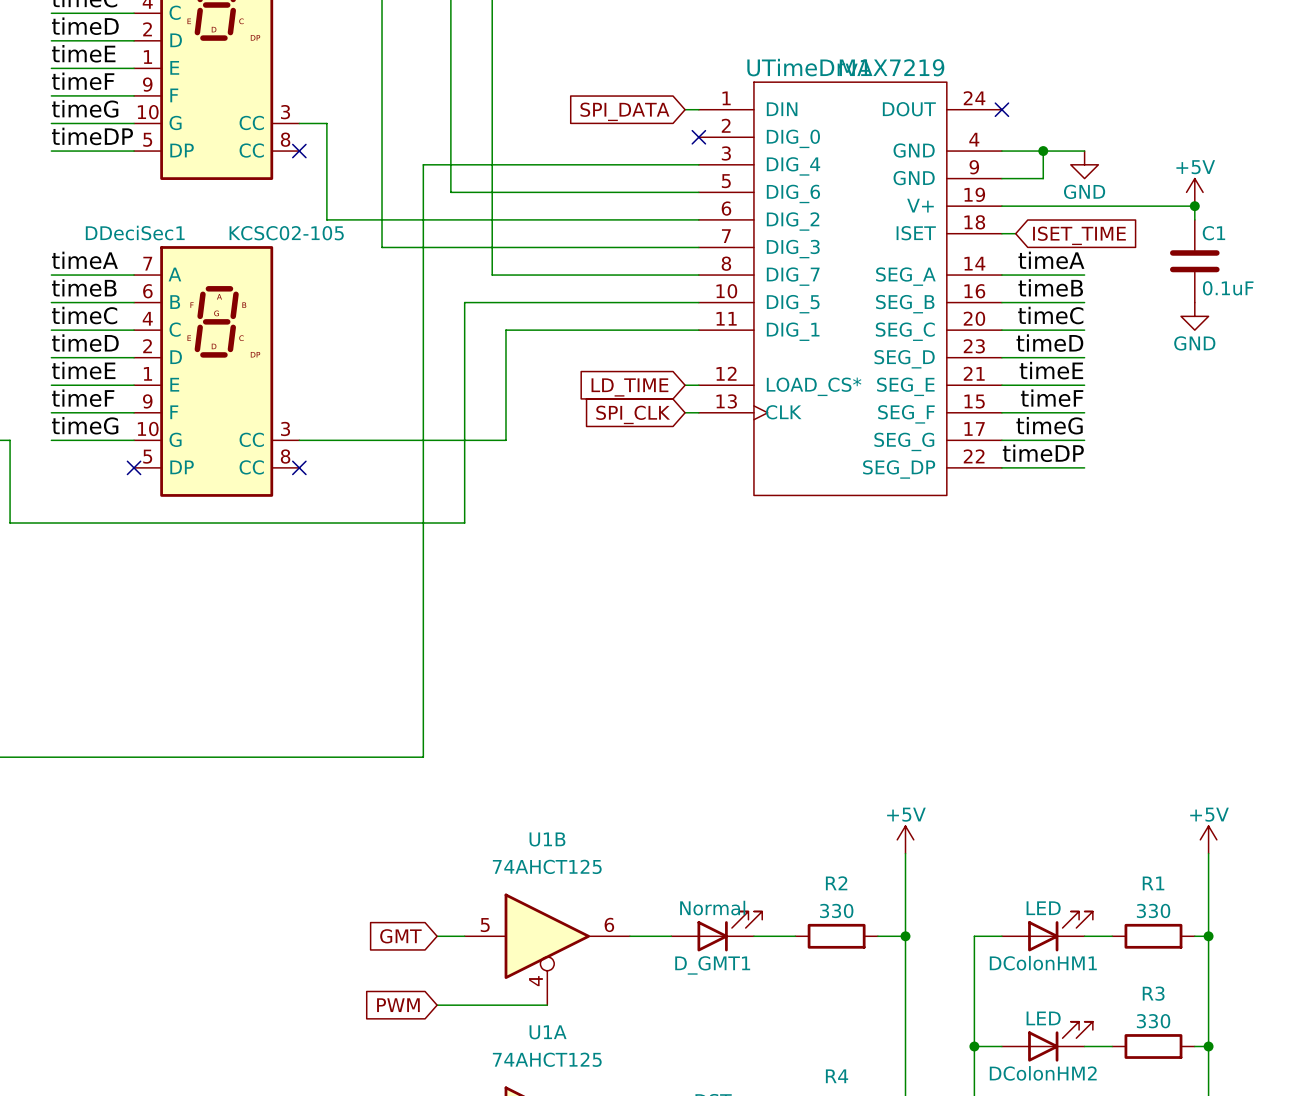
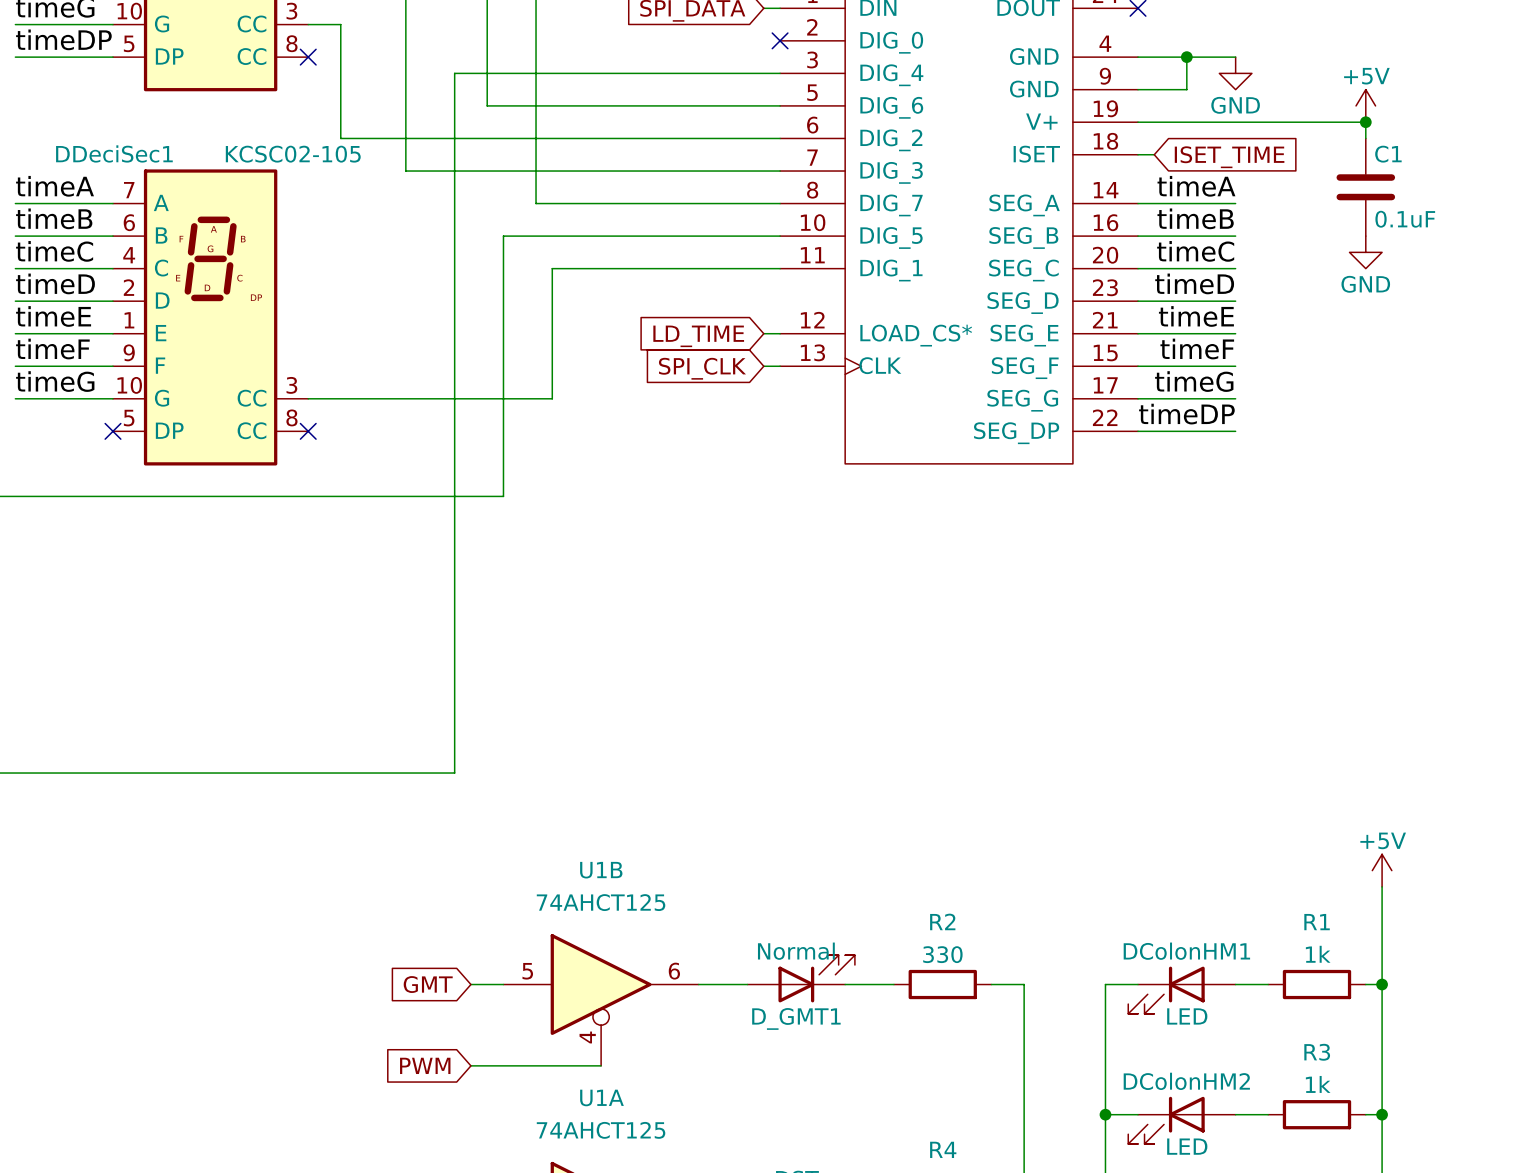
power symbol: +5V (905, 839) -> none
wire: (905, 853) (905, 936) -> none
R1 value: 330 (1153, 910) -> 1k (1318, 954)
DColonHM1 rotation: 0° (1060, 931) -> 180° (1166, 990)
junction: (905, 936) -> none
R3 value: 330 (1153, 1021) -> 1k (1318, 1084)
DColonHM2 rotation: 0° (1060, 1041) -> 180° (1166, 1120)

